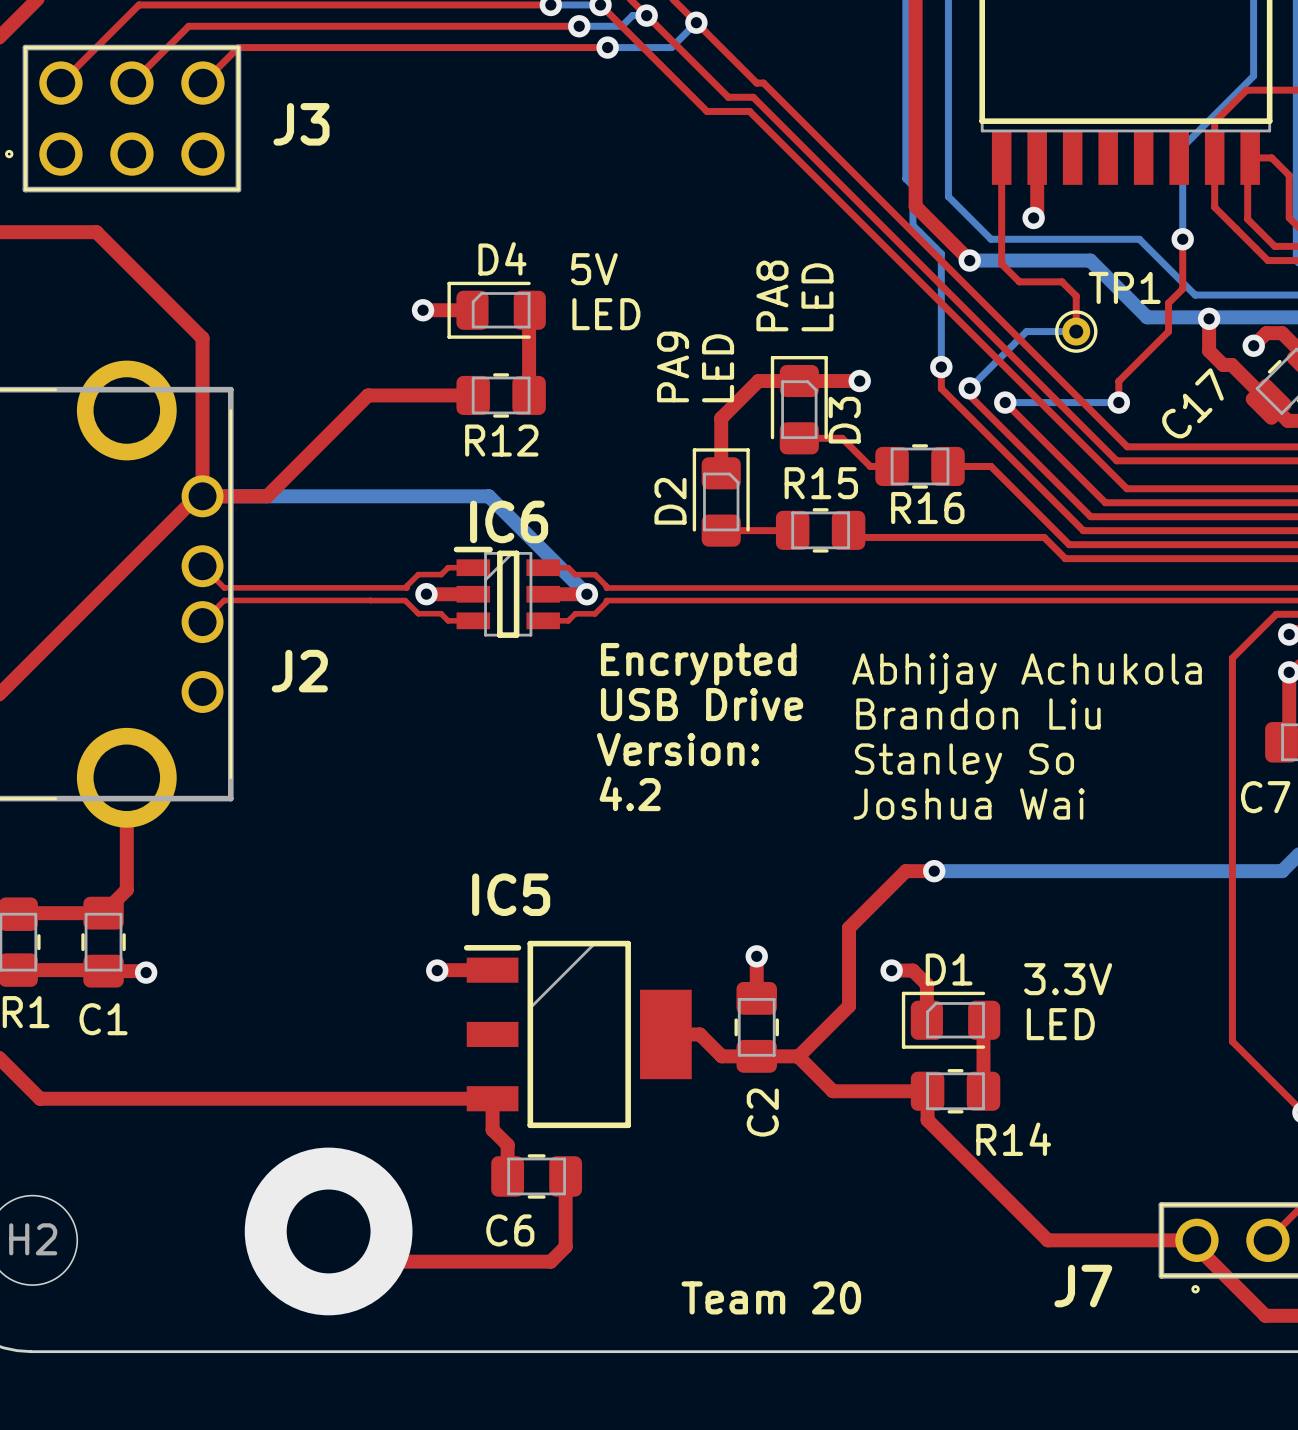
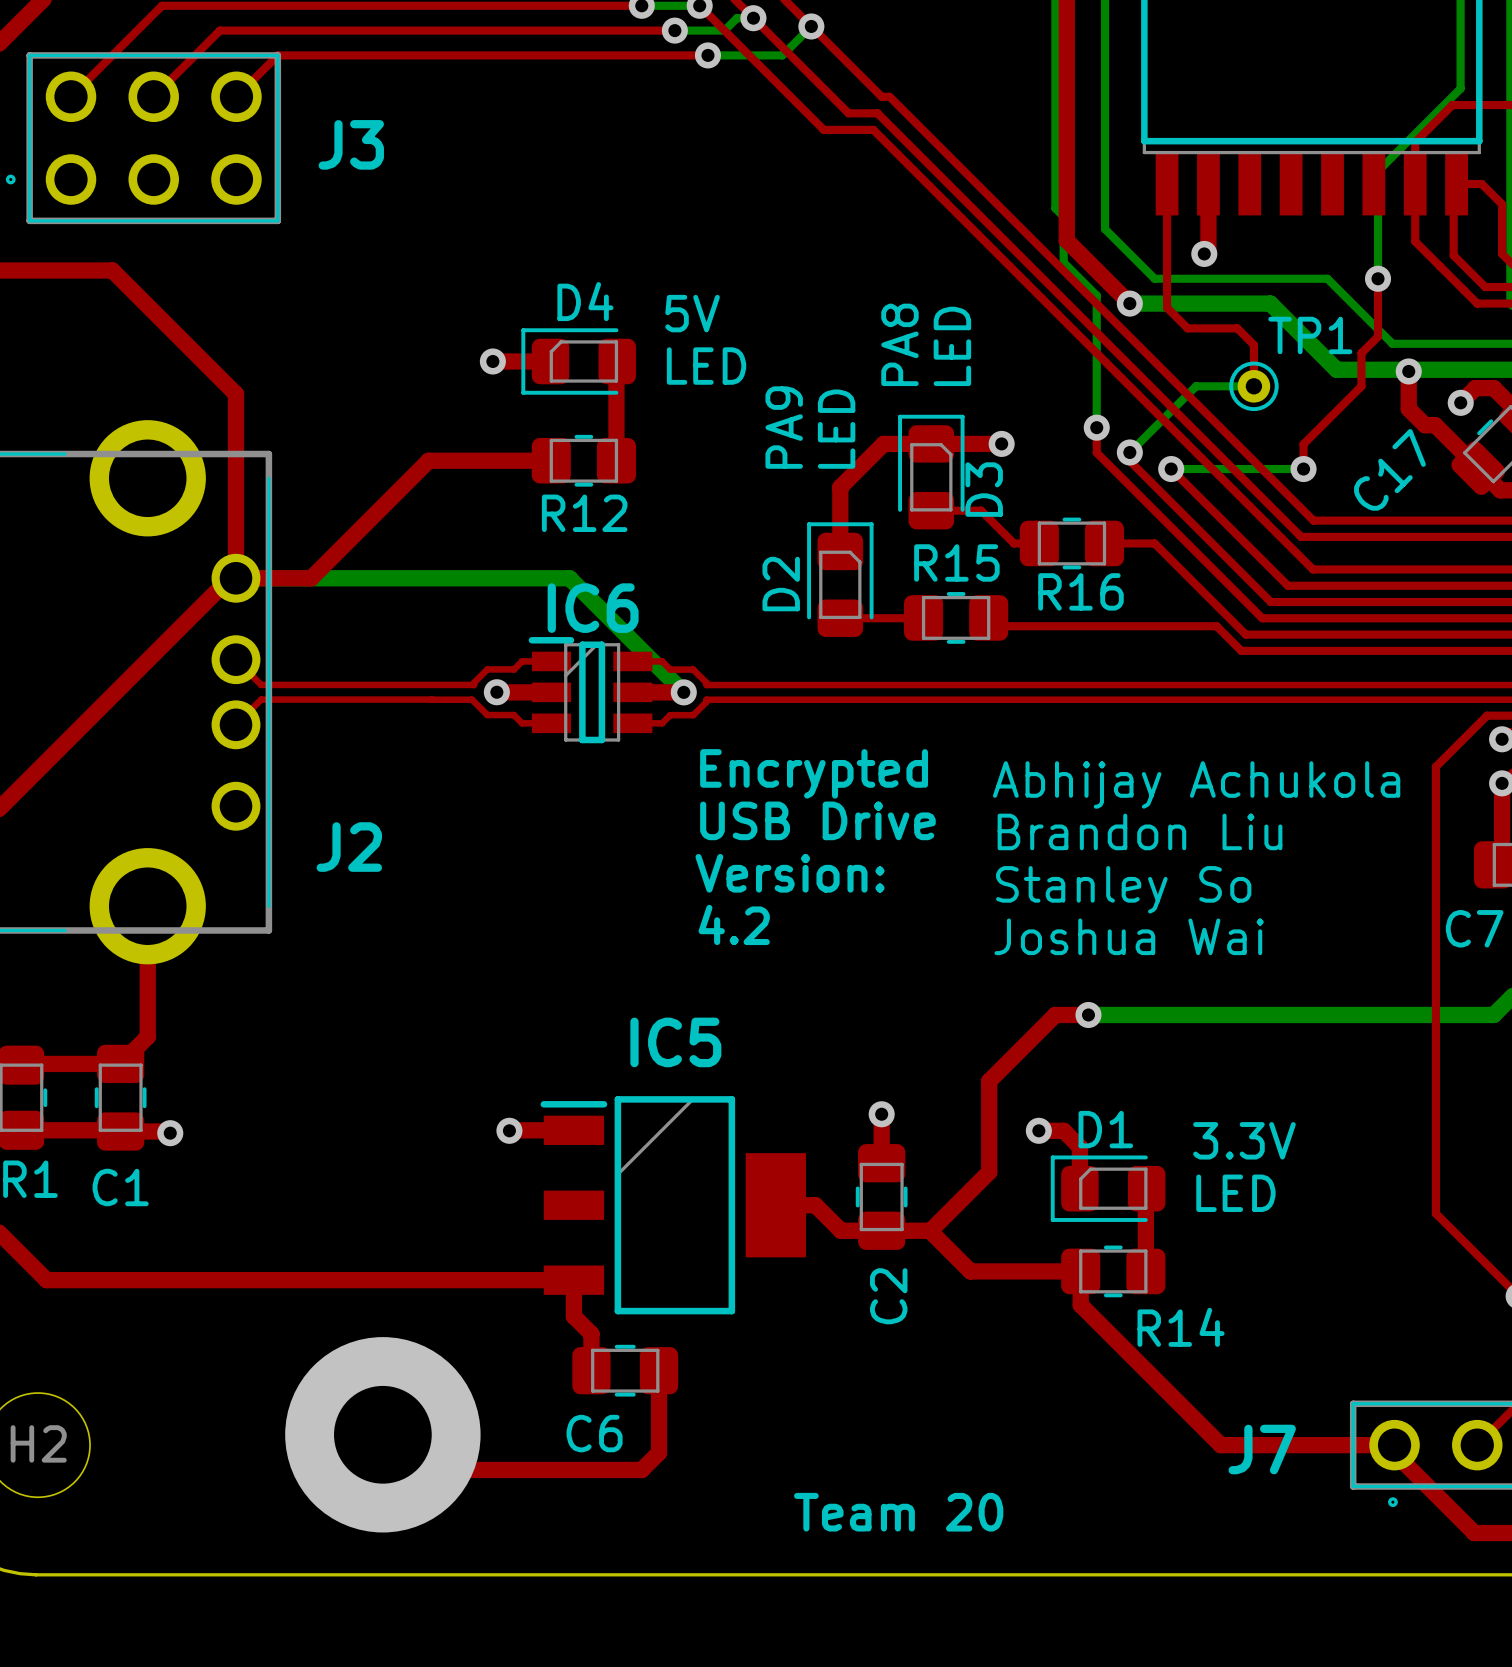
J2 name position: J2 (299, 671) -> J2 (349, 847)
IC5 name position: IC5 (511, 894) -> IC5 (675, 1042)
J7 name position: J7 (1083, 1286) -> J7 (1262, 1449)

